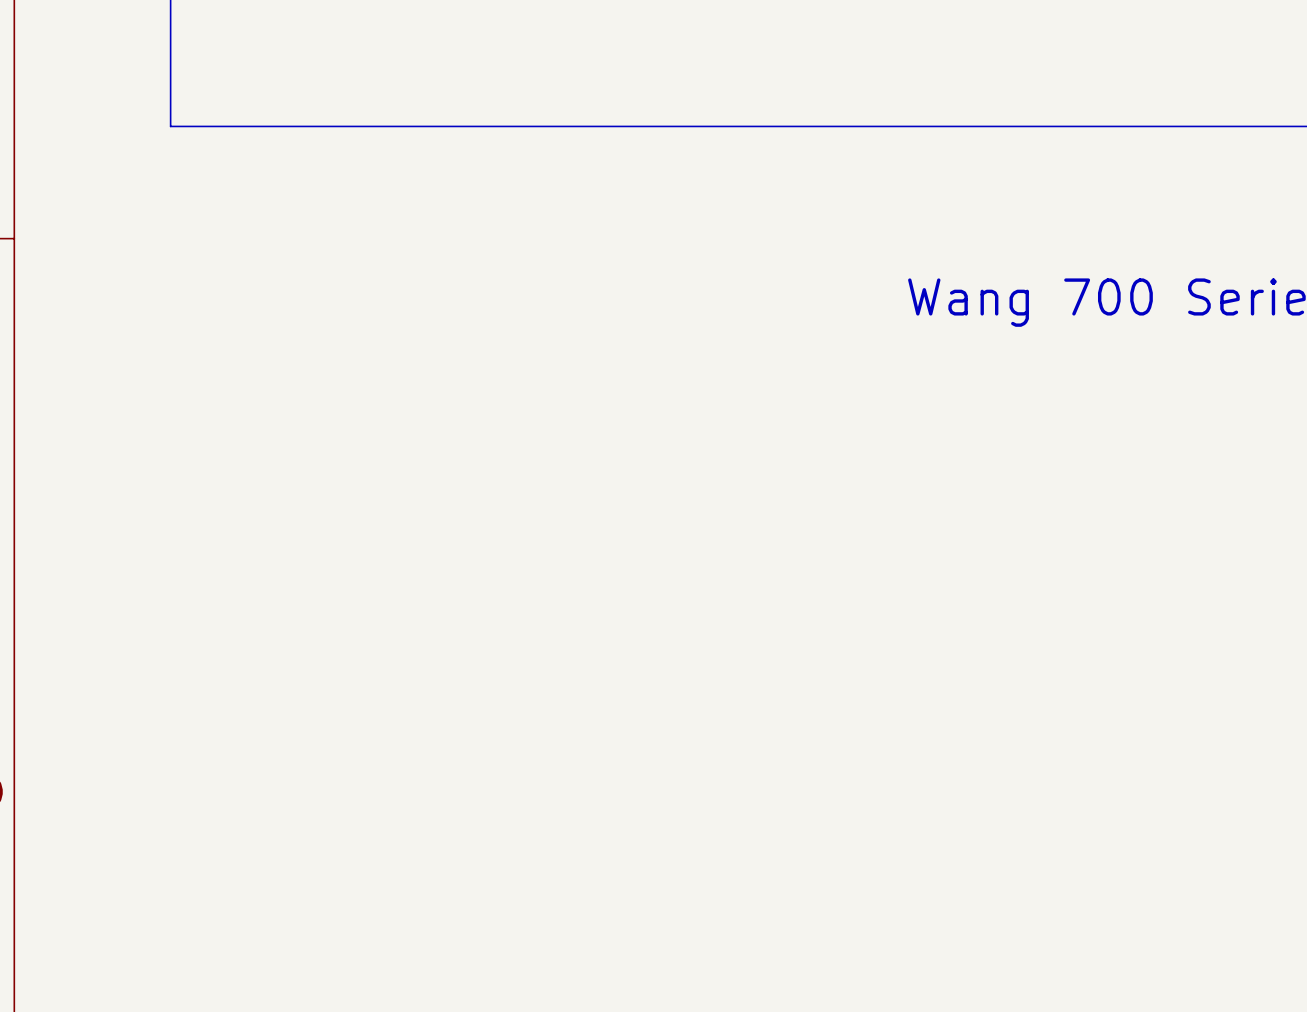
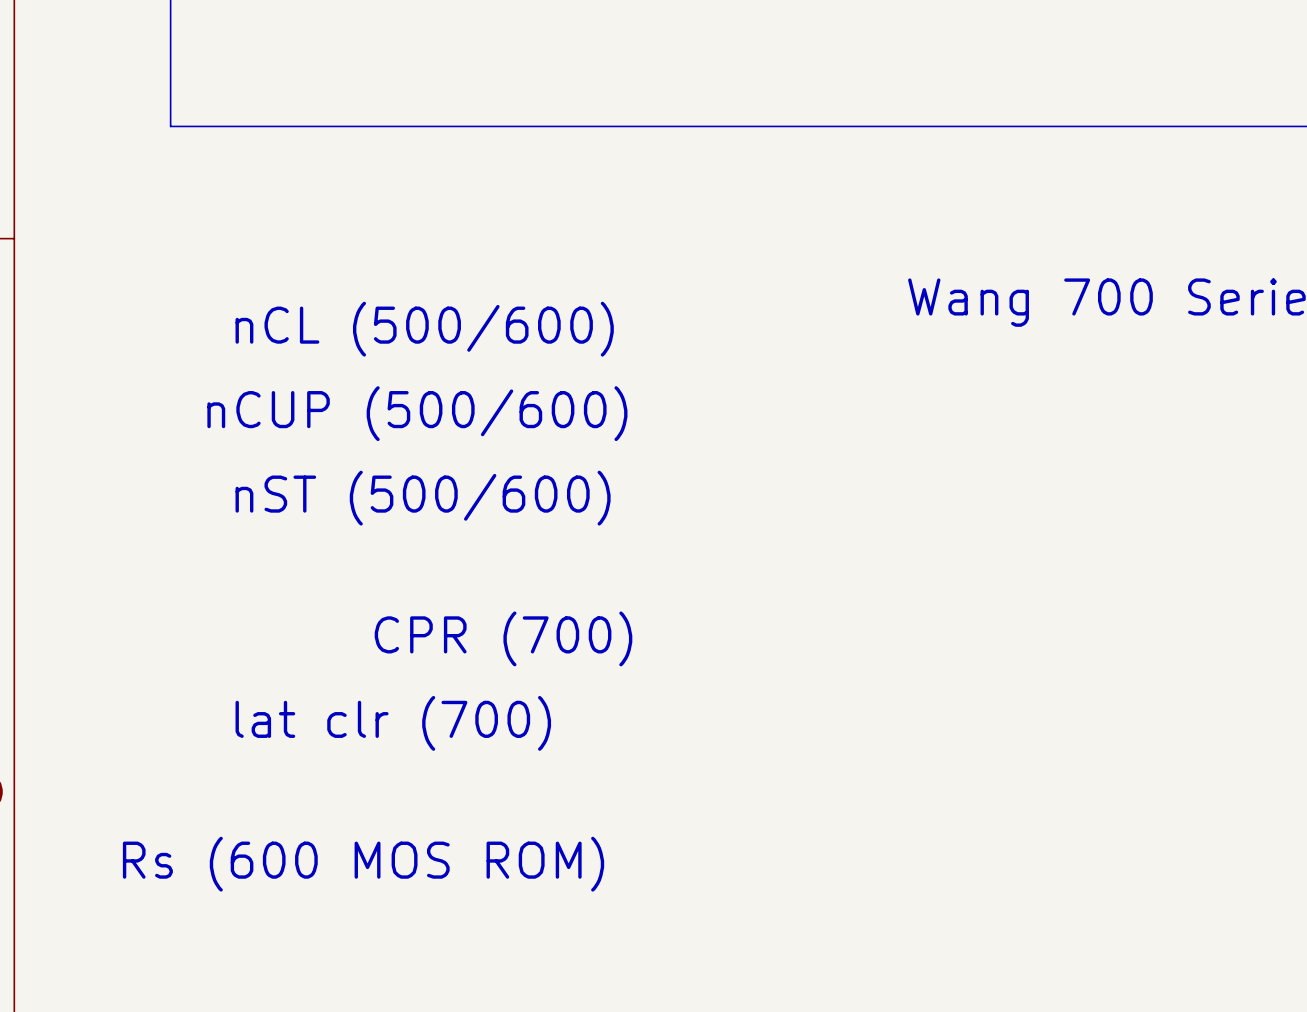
text: none -> nCL (500/600) (424, 329)
text: none -> nCUP (500/600) (417, 413)
text: none -> nST (500/600) (423, 498)
text: none -> CPR (700) (503, 638)
text: none -> lat clr (700) (393, 723)
text: none -> Rs (600 MOS ROM) (363, 864)

